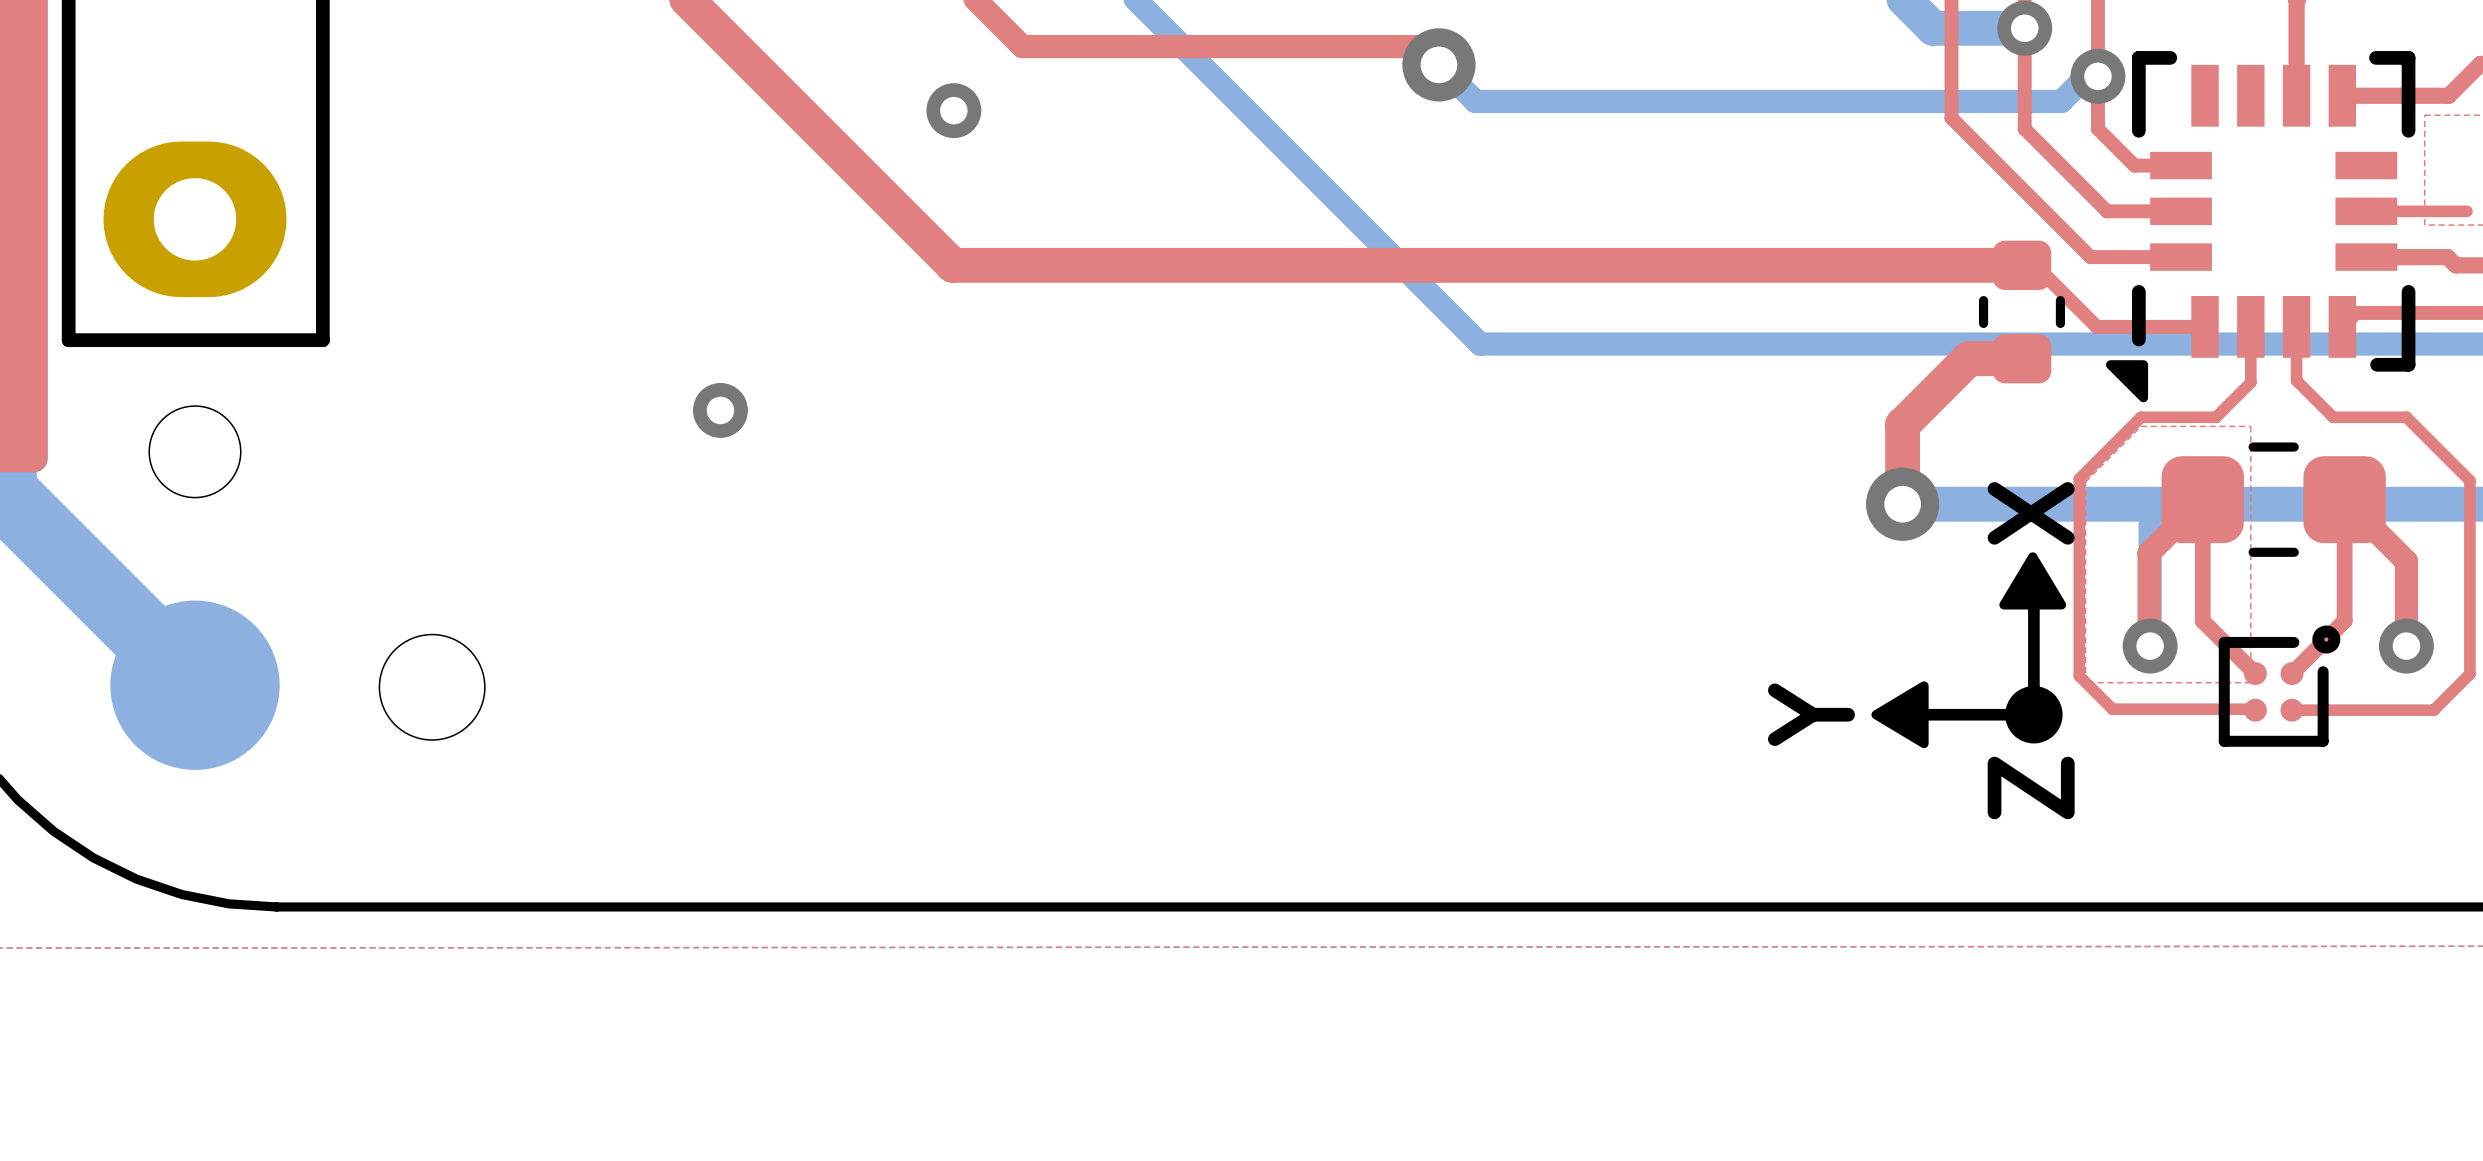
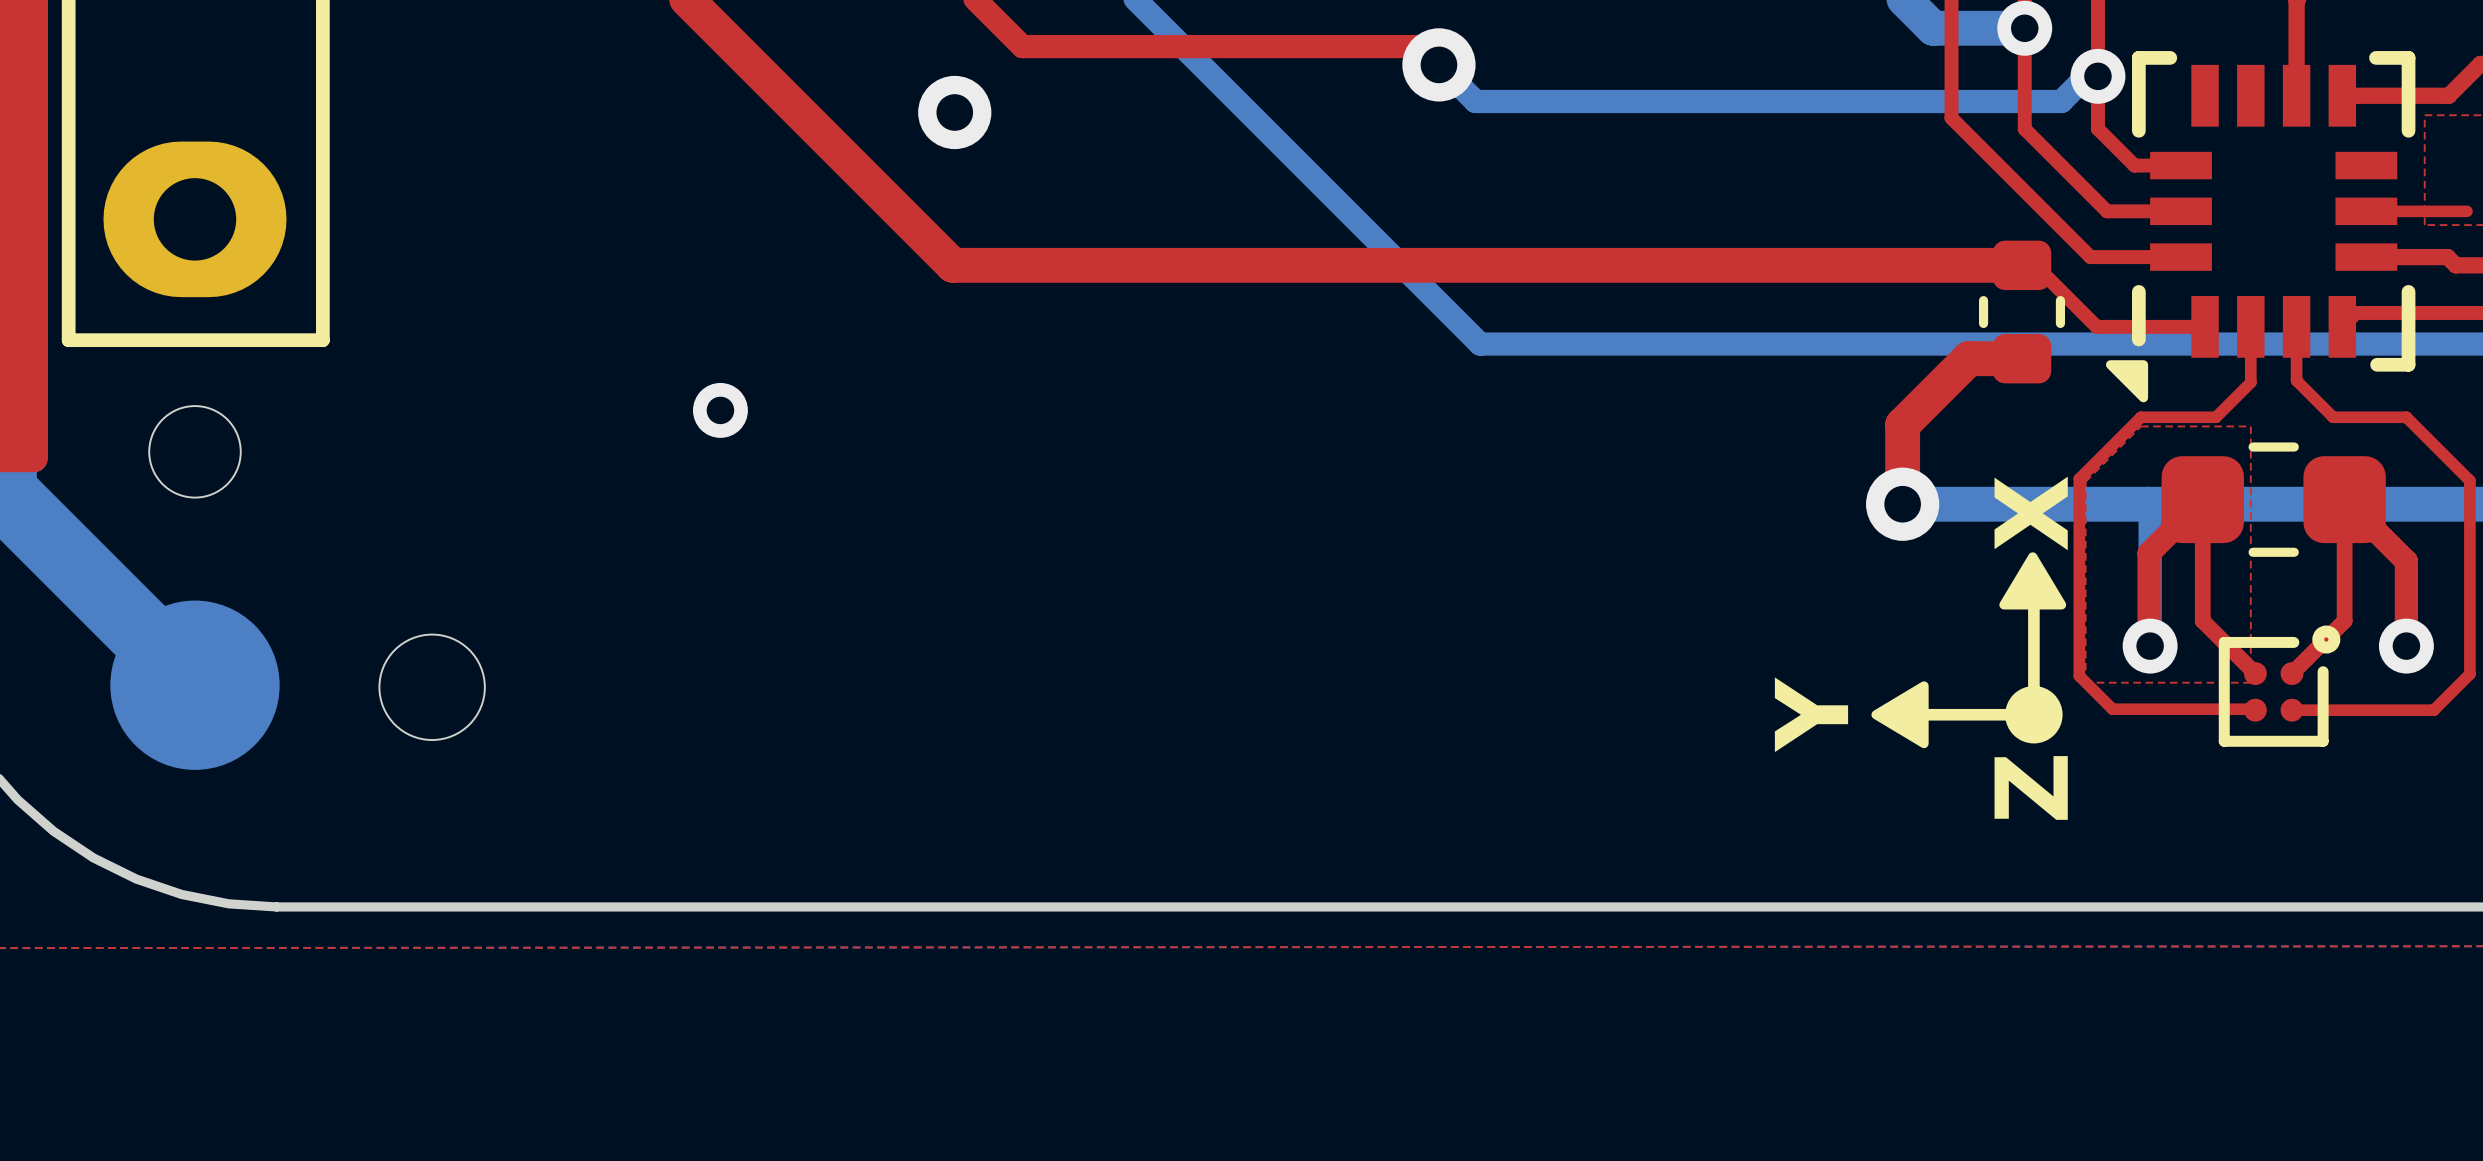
via size: [926, 83, 982, 139] -> [918, 75, 992, 150]

